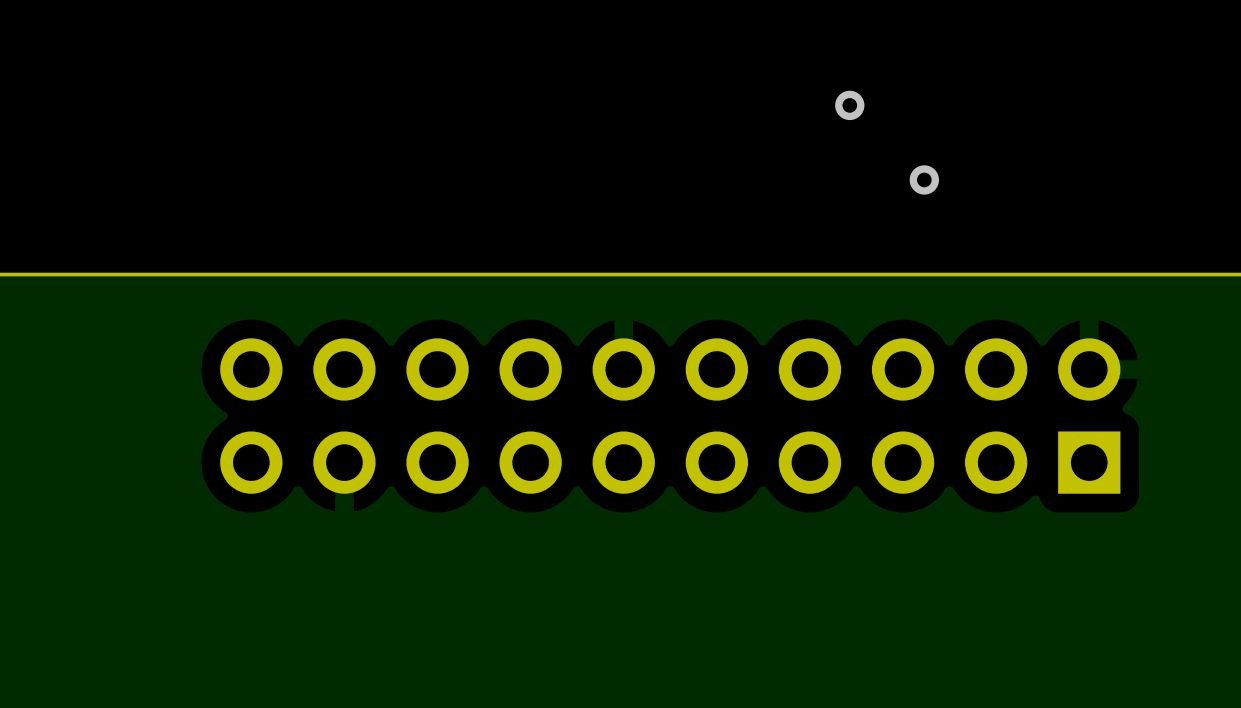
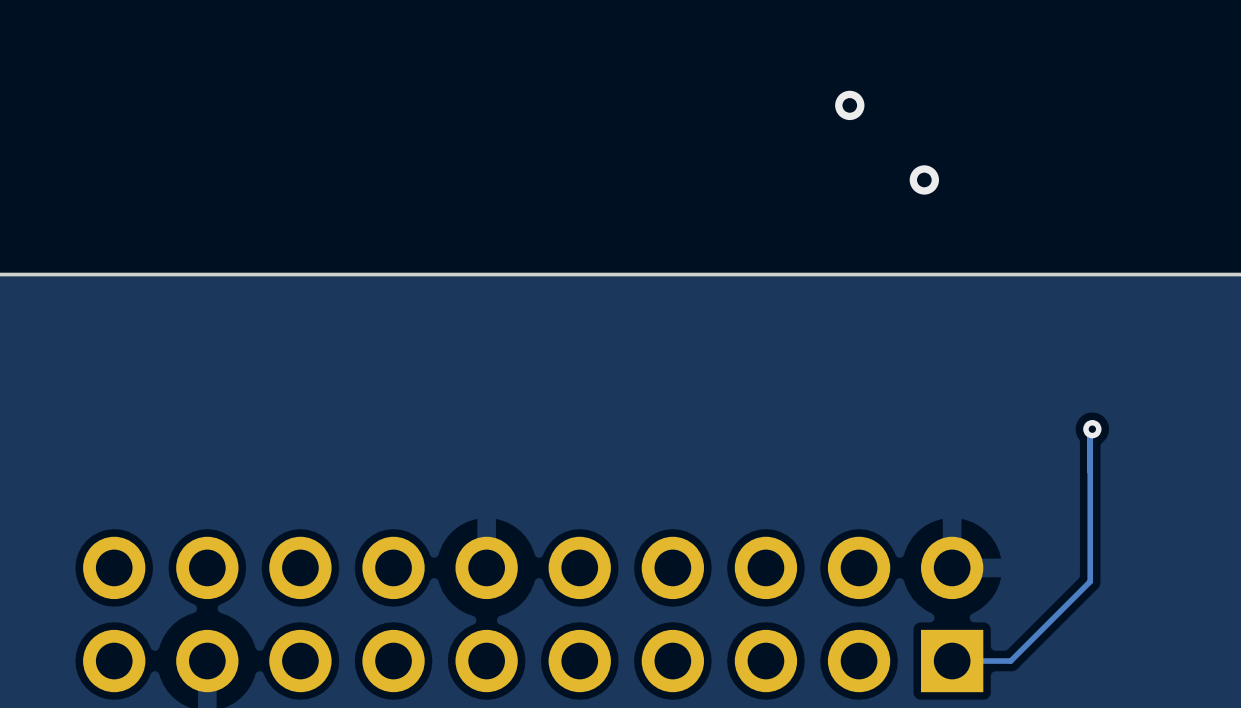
part position: (670, 416) -> (533, 614)
track: none -> (1092, 429) (1090, 435) (1090, 581) (1010, 661) (952, 661)
via: none -> (1092, 429)

